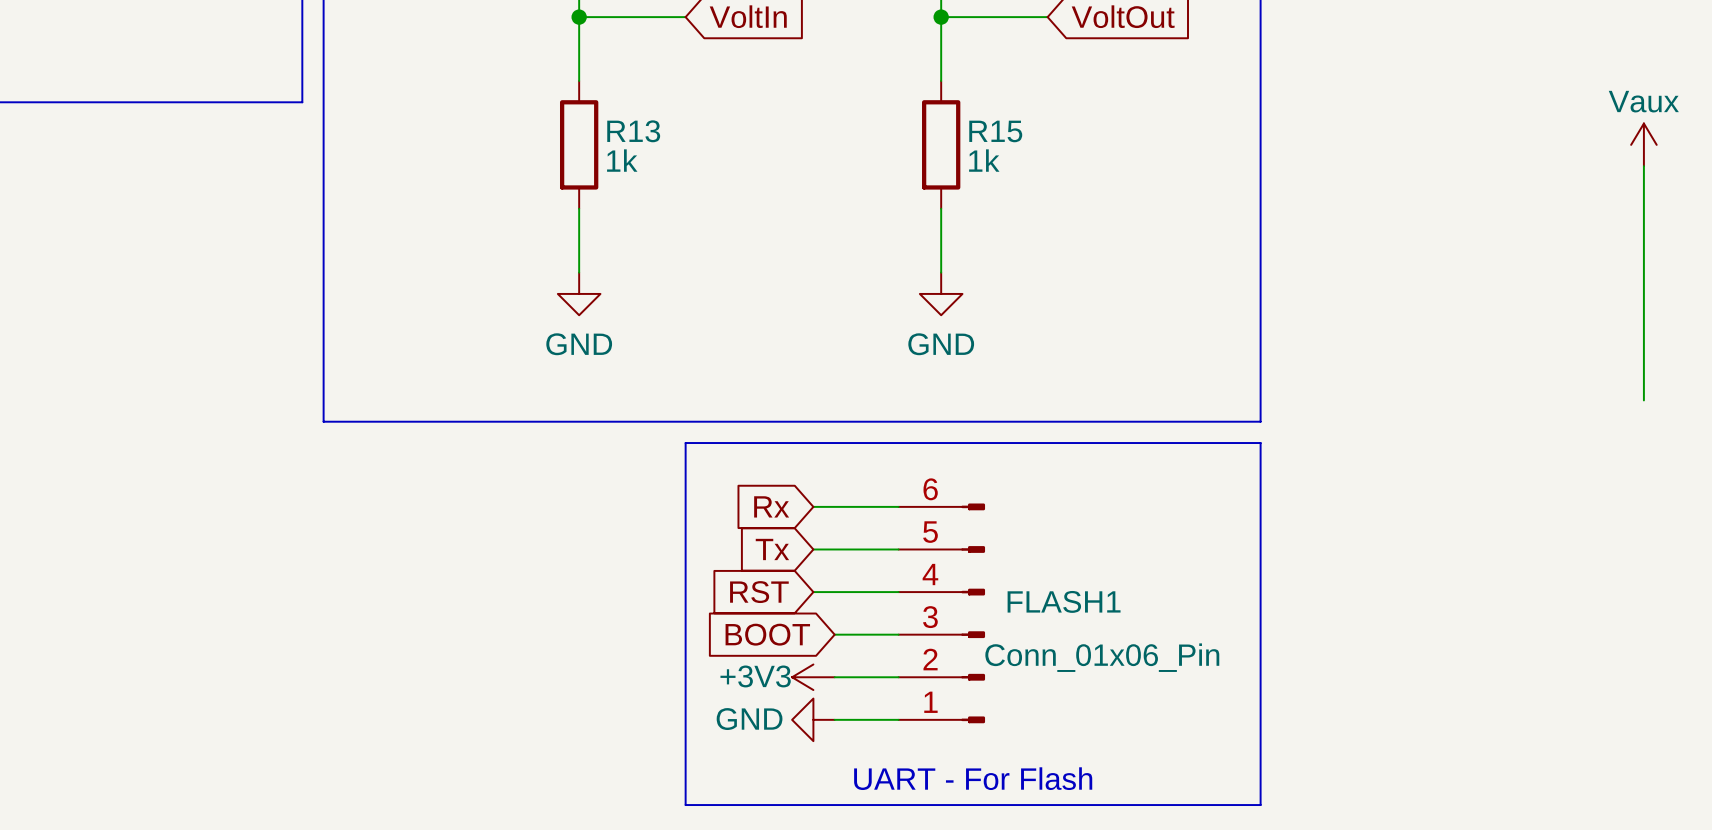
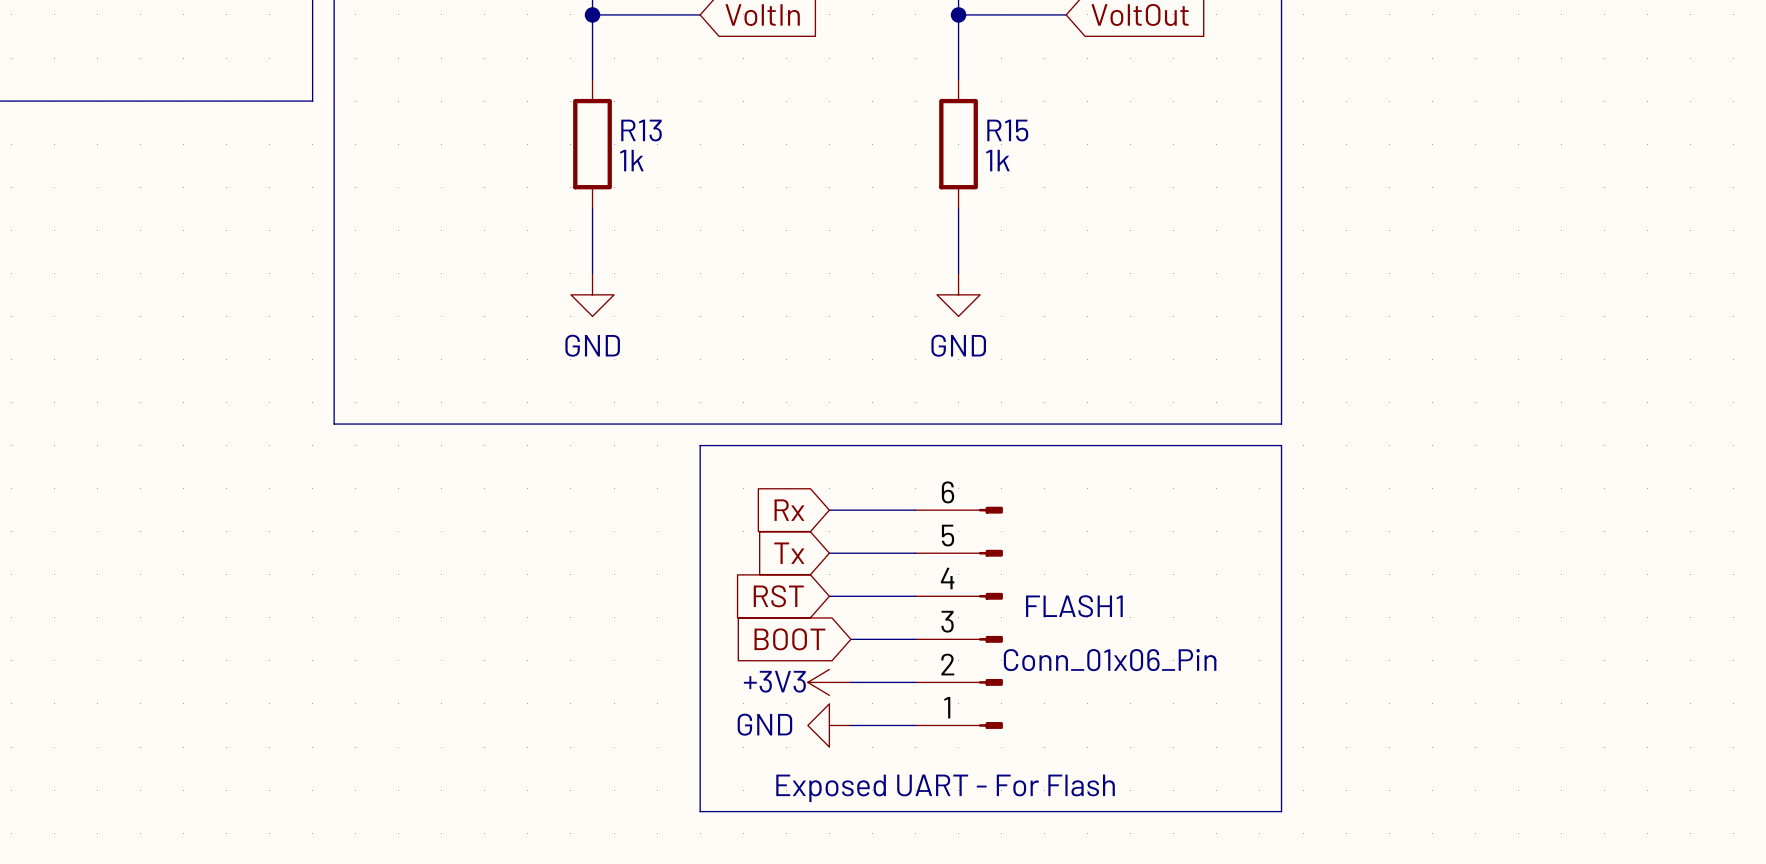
power symbol: Vaux (1643, 144) -> none
wire: (1643, 166) (1643, 400) -> none
text: UART - For Flash (973, 778) -> Exposed UART - For Flash (945, 788)

